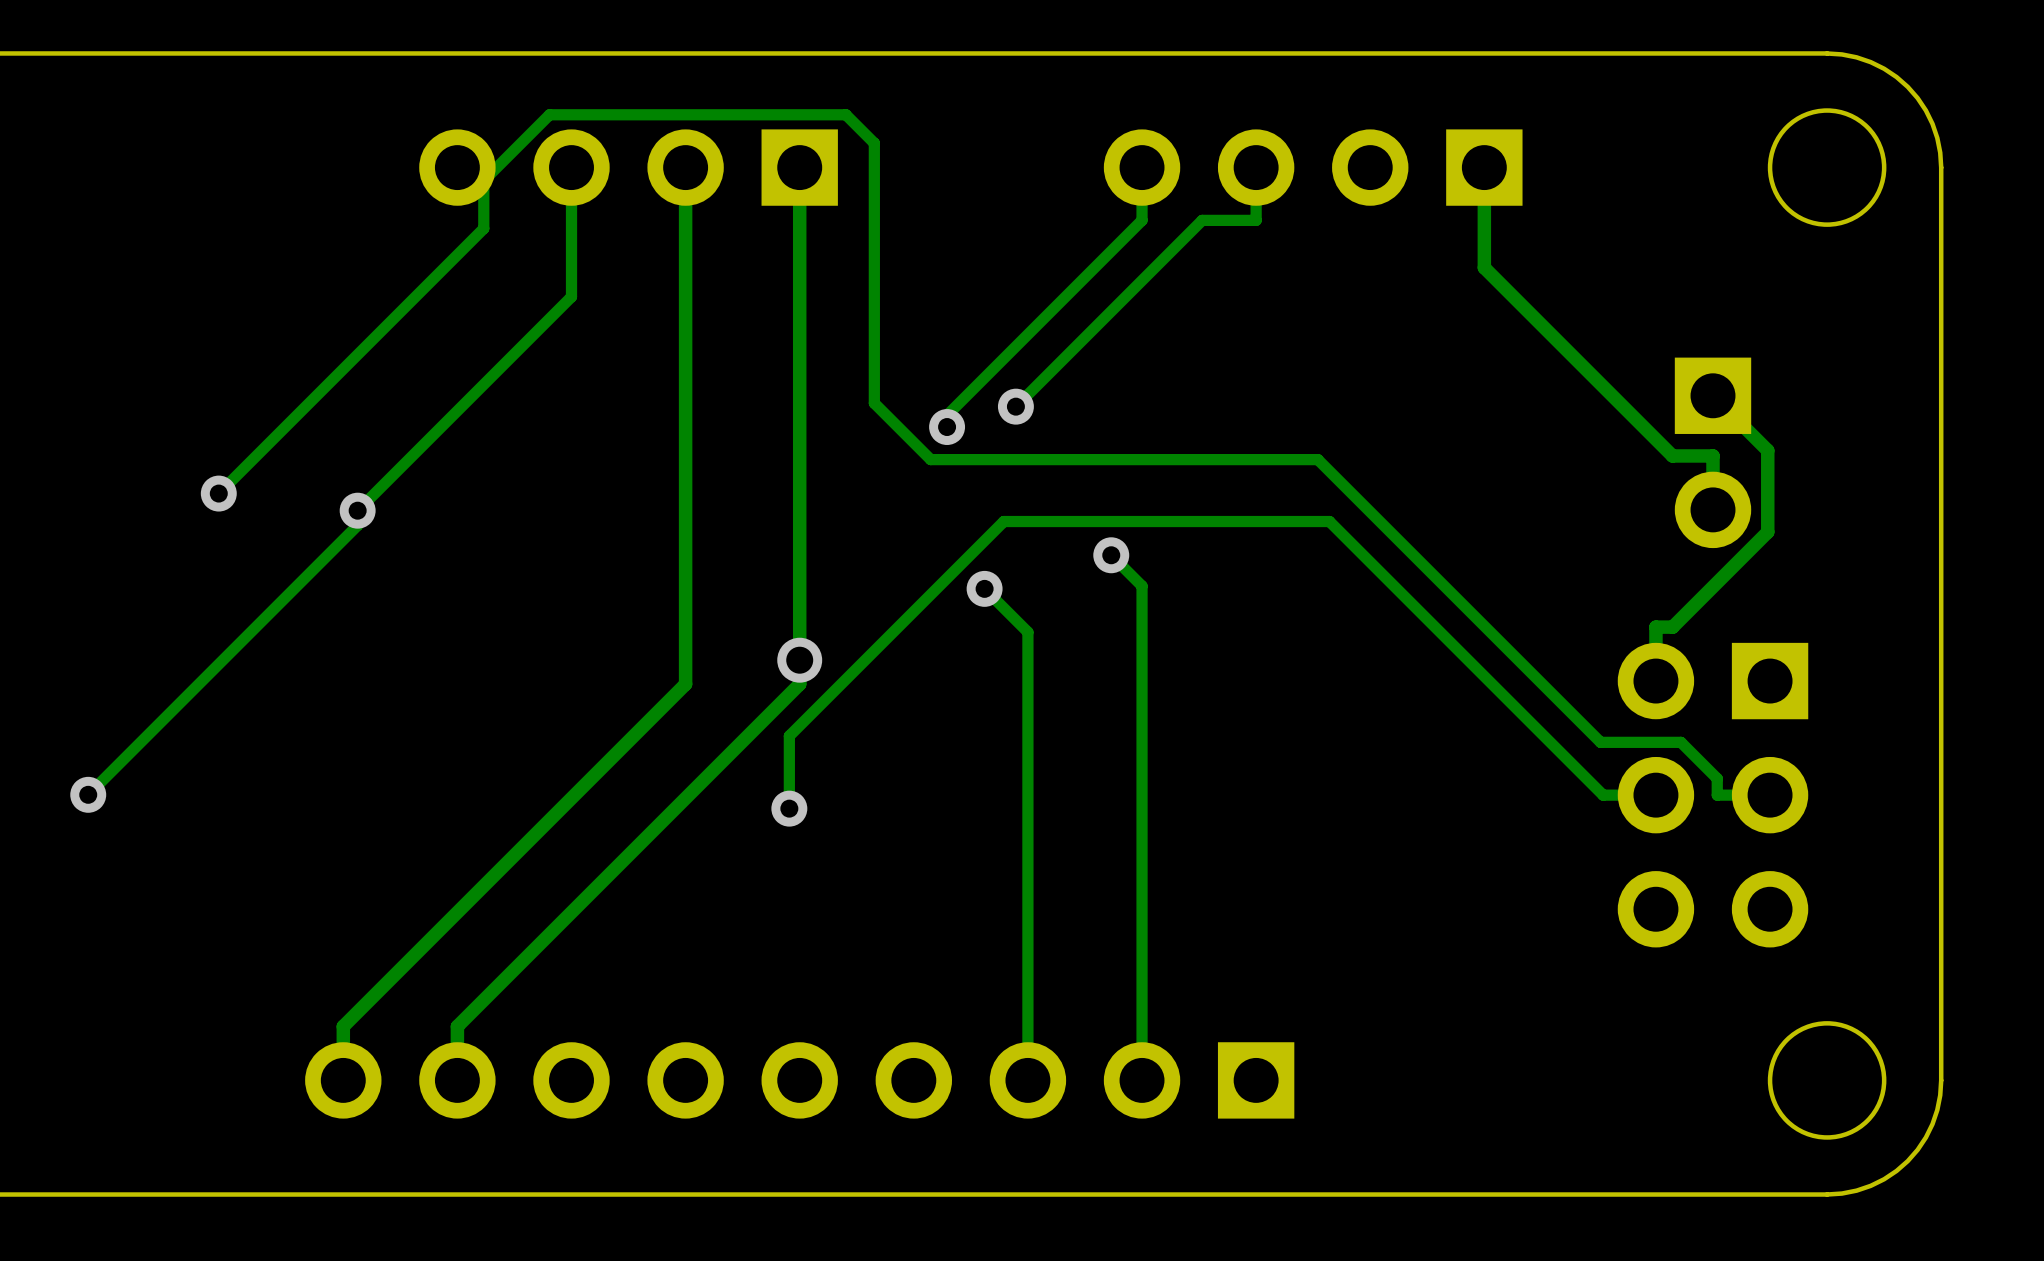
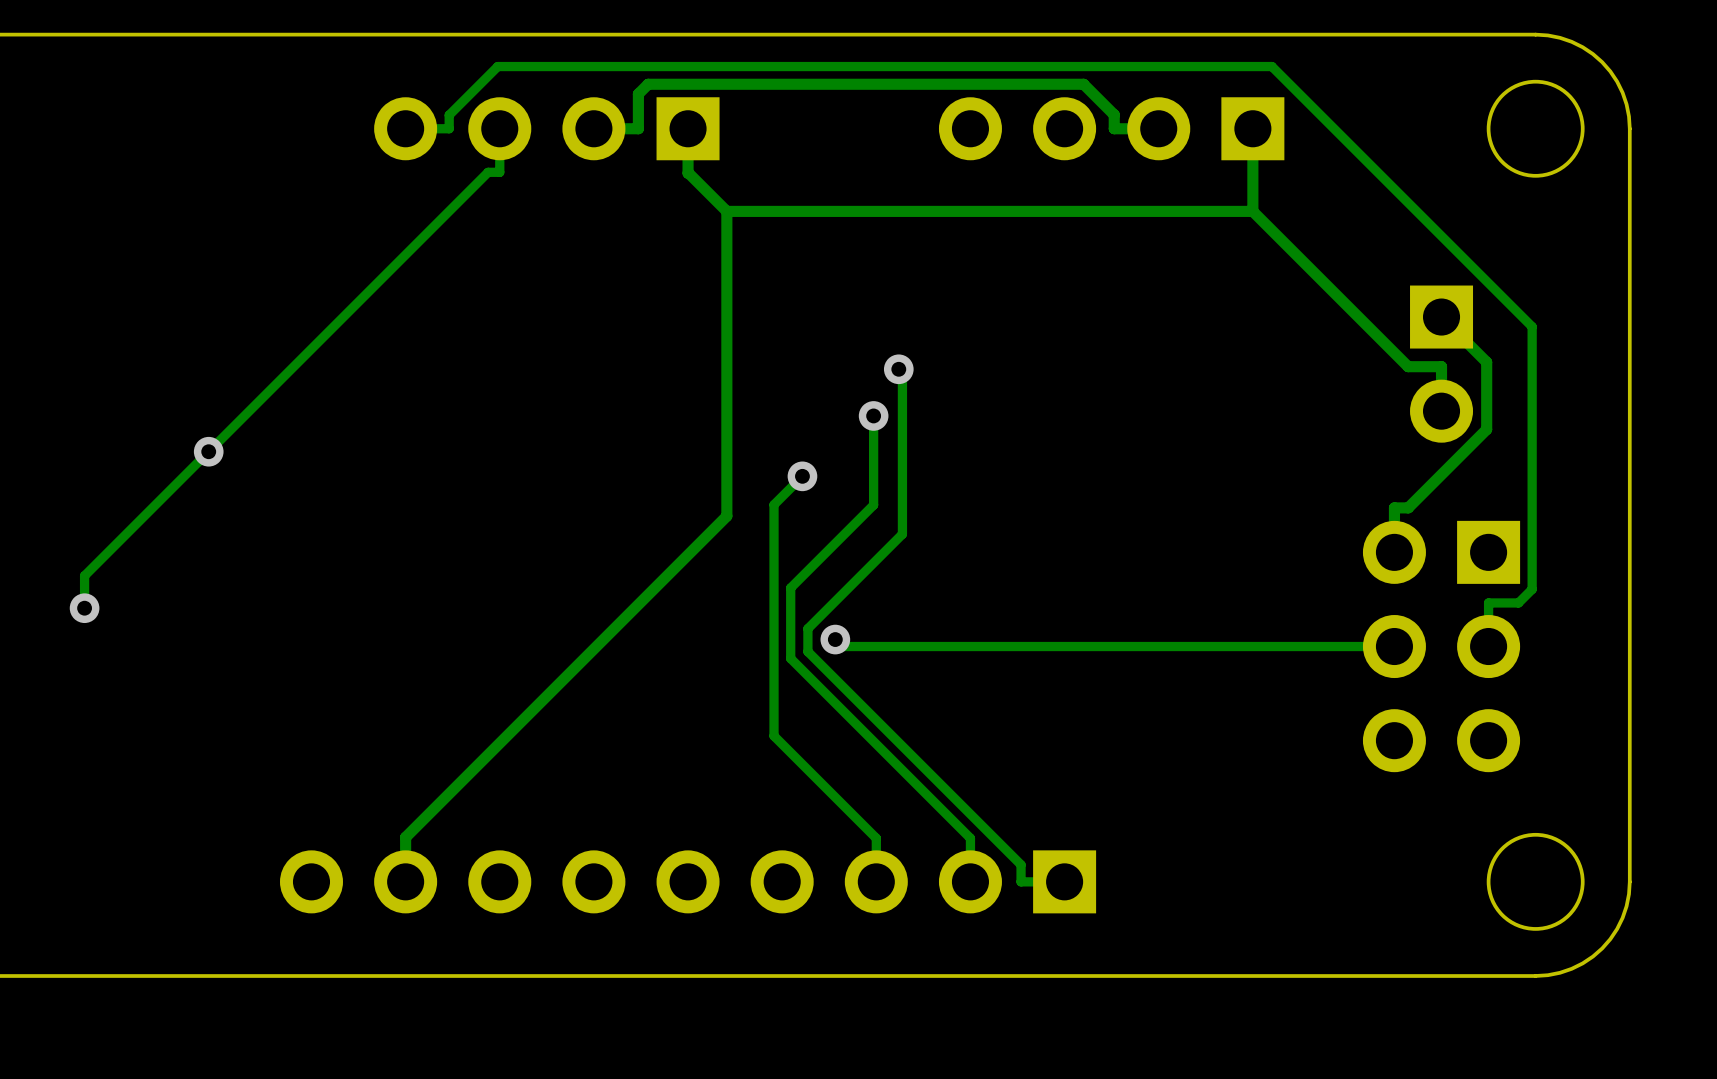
track: (483, 167) (483, 228) (218, 493) -> none
track: (685, 167) (685, 684) (343, 1026) (343, 1080) -> (593, 128) (638, 128) (638, 94) (648, 84) (1083, 84) (1114, 114) (1114, 128) (1158, 128)
track: (1142, 167) (1142, 220) (947, 415) (947, 427) -> none
track: (1256, 167) (1256, 220) (1202, 220) (1015, 406) -> none
track: (483, 180) (549, 114) (845, 114) (874, 143) (874, 403) (930, 459) (1317, 459) (1600, 742) (1680, 742) (1717, 778) (1717, 795) (1770, 795) -> (427, 128) (449, 128) (449, 115) (497, 66) (1271, 66) (1532, 326) (1532, 589) (1518, 602) (1488, 602) (1488, 646)
track: (571, 220) (571, 296) (357, 510) (357, 525) (88, 794) -> (499, 172) (488, 172) (84, 575) (84, 608)
track: (799, 221) (799, 684) -> (726, 211) (726, 516) (688, 554)
track: none -> (688, 173) (726, 211)
track: none -> (1252, 211) (726, 211)
via: (1015, 406) -> none
via: (947, 427) -> none
track: none -> (898, 369) (902, 372) (902, 534) (807, 628) (807, 651) (1021, 864) (1021, 881) (1064, 881)
via: none -> (898, 369)
via position: (218, 493) -> (208, 451)
via: (357, 510) -> none
via: none -> (873, 415)
track: (1111, 555) (1142, 586) (1142, 1027) -> (873, 415) (873, 505) (790, 587) (790, 658) (970, 838)
via: (1111, 555) -> none
via: none -> (802, 476)
track: (984, 588) (1027, 632) (1027, 1027) -> (802, 476) (774, 504) (774, 735) (876, 838)
via: (984, 588) -> none
via: (799, 660) -> none
via: none -> (835, 639)
via position: (88, 794) -> (84, 608)
track: (1603, 795) (1329, 521) (1003, 521) (789, 736) (789, 808) -> (1350, 646) (842, 646) (835, 639)
via: (789, 808) -> none

